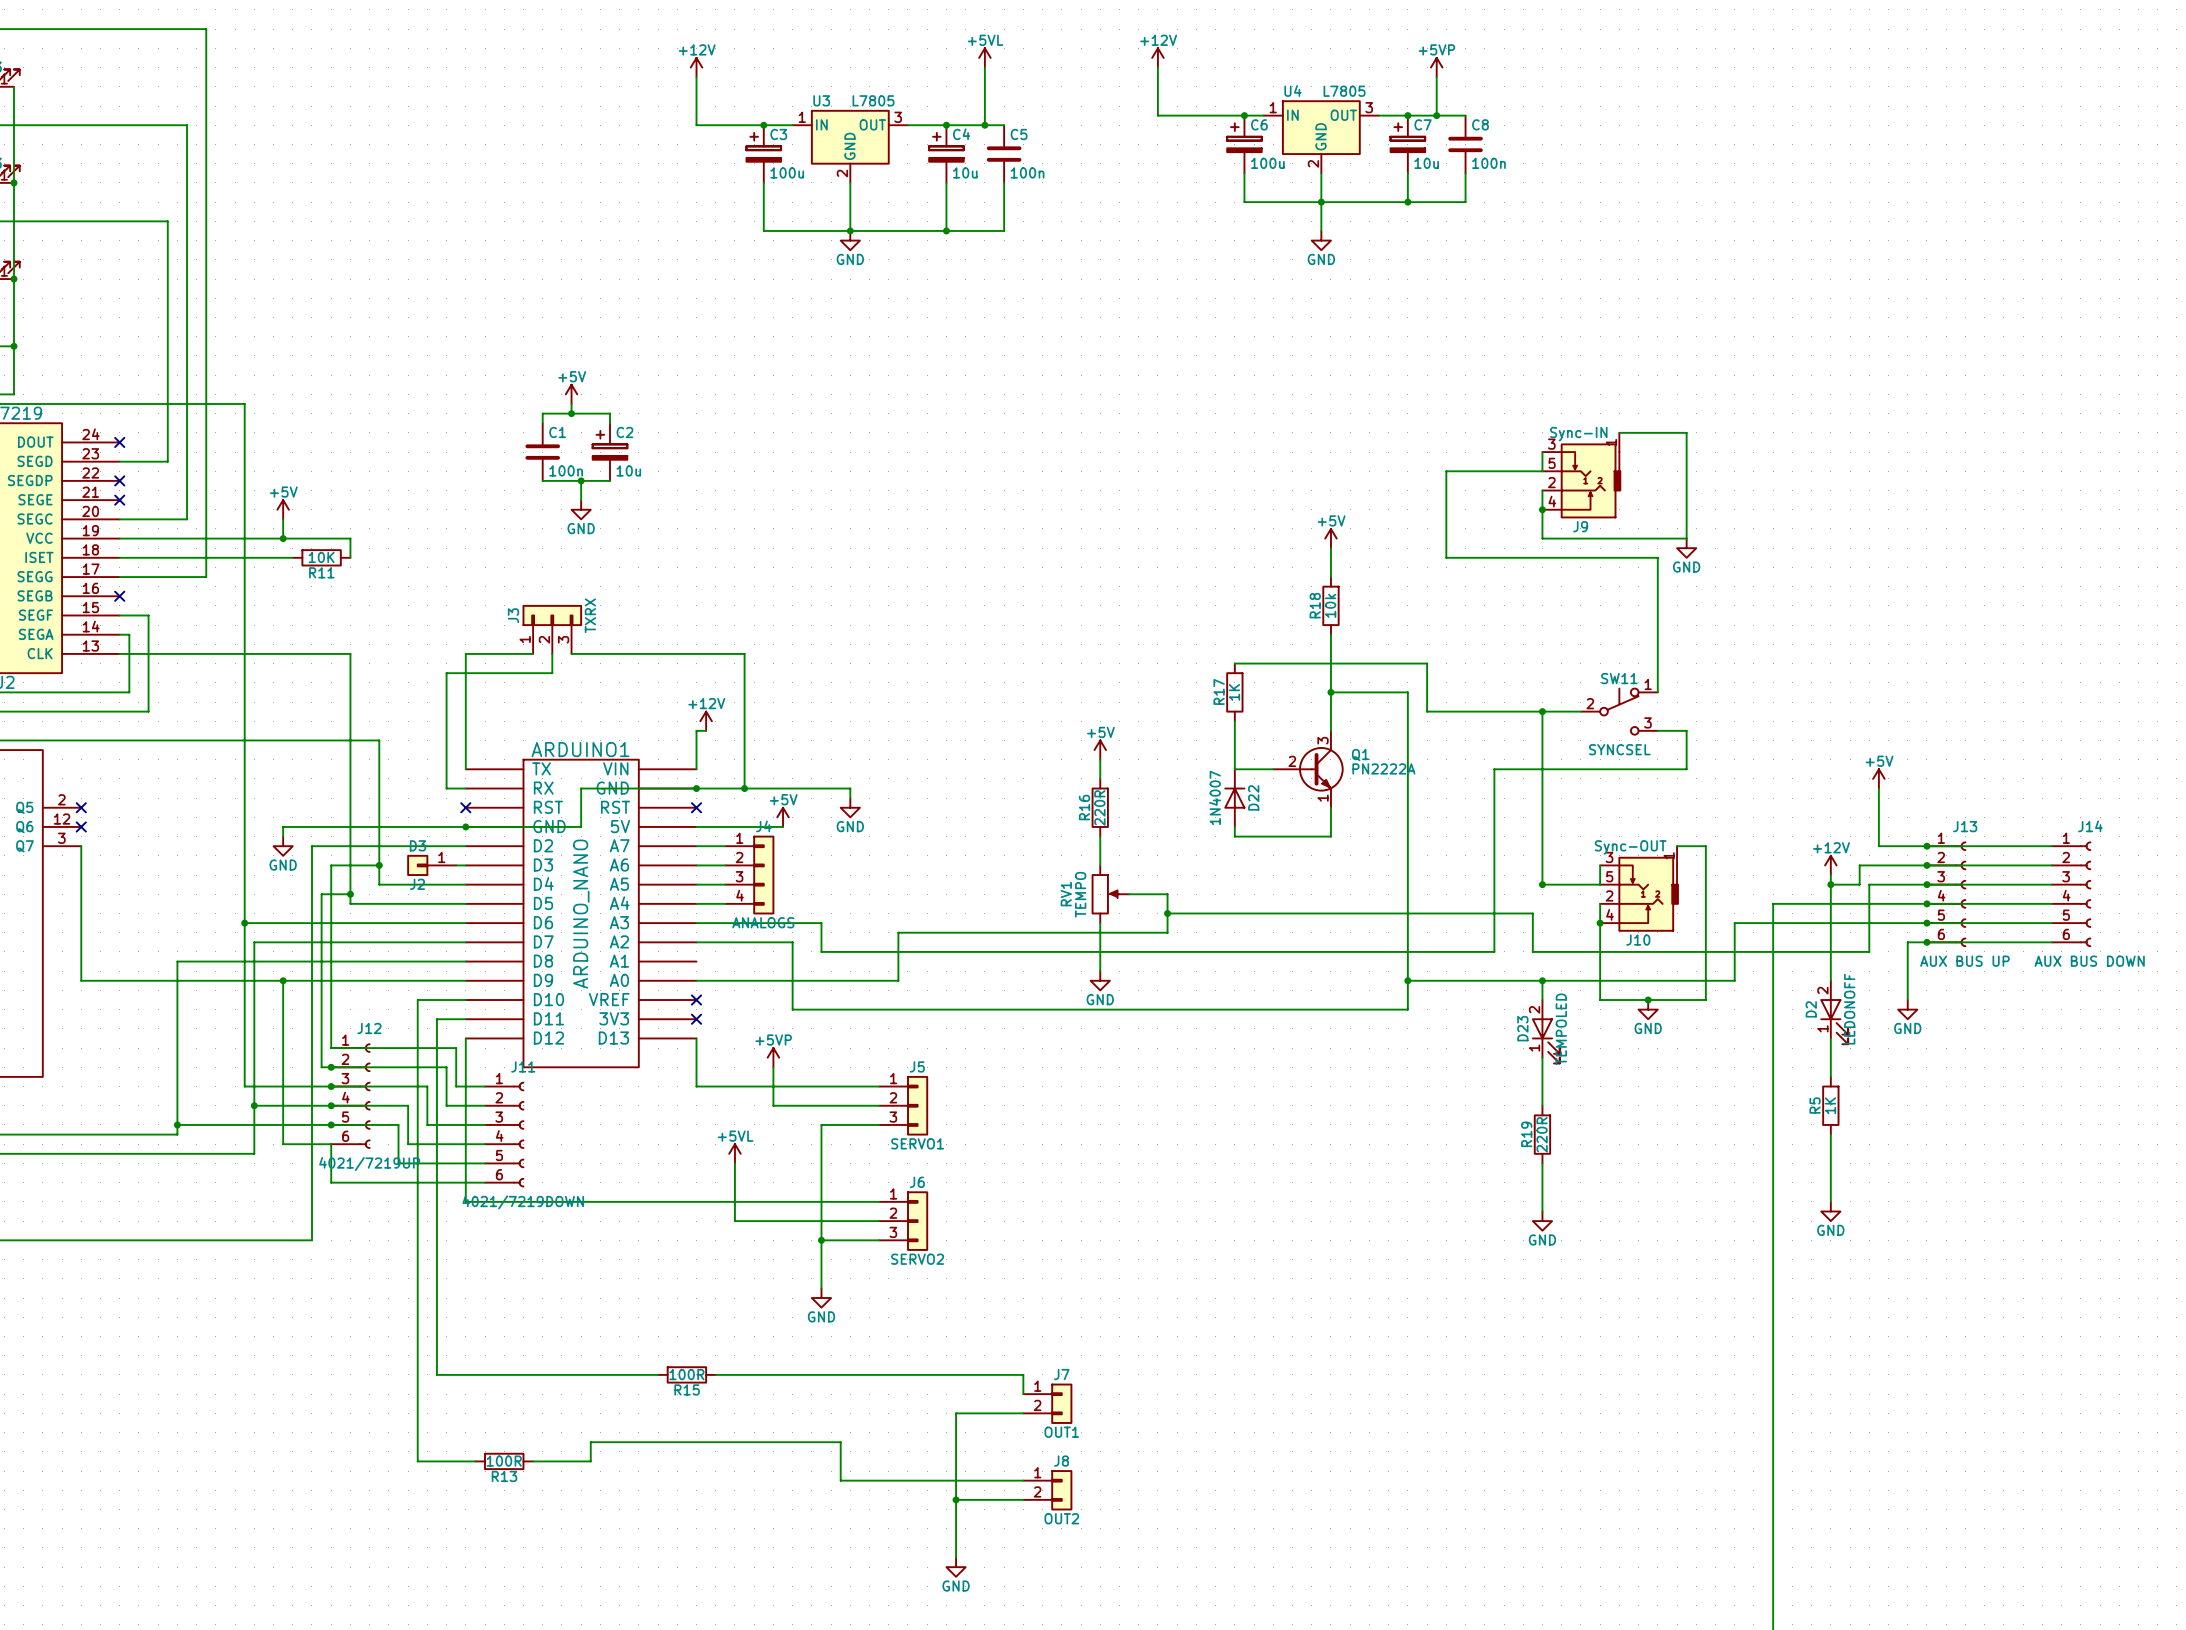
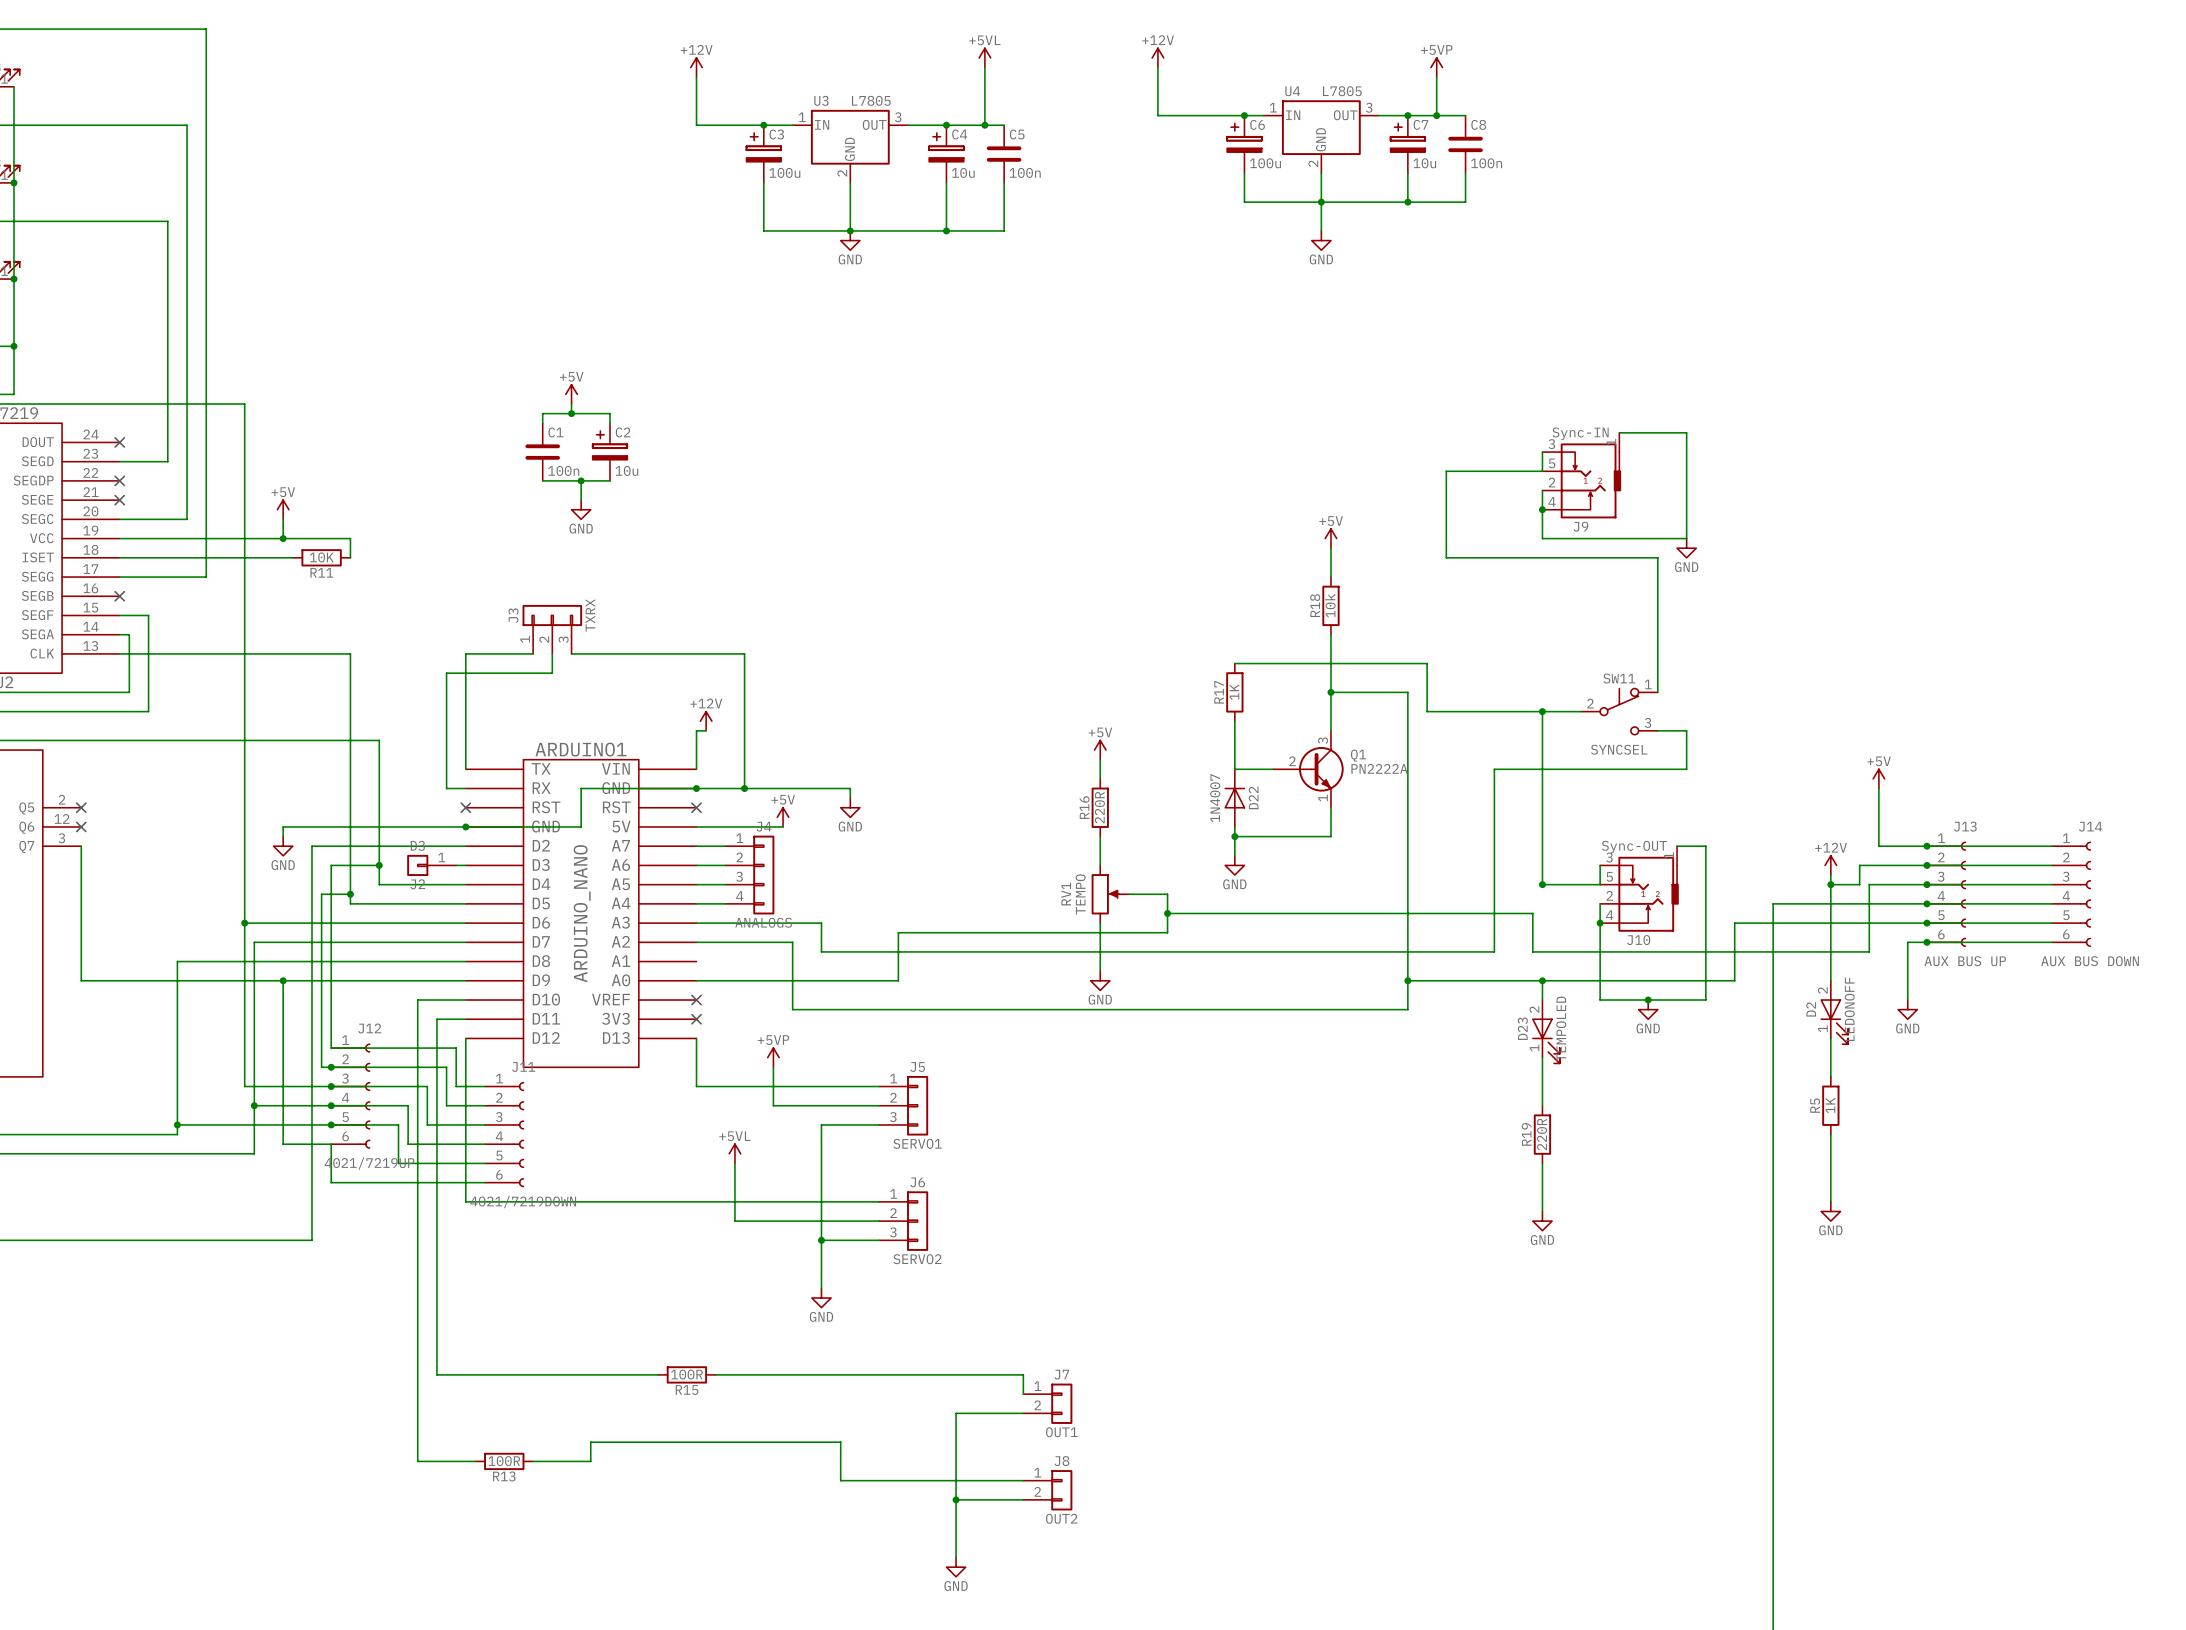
wire: none -> (1234, 836) (1234, 855)
junction: none -> (1234, 836)
power symbol: none -> GND (1234, 865)

